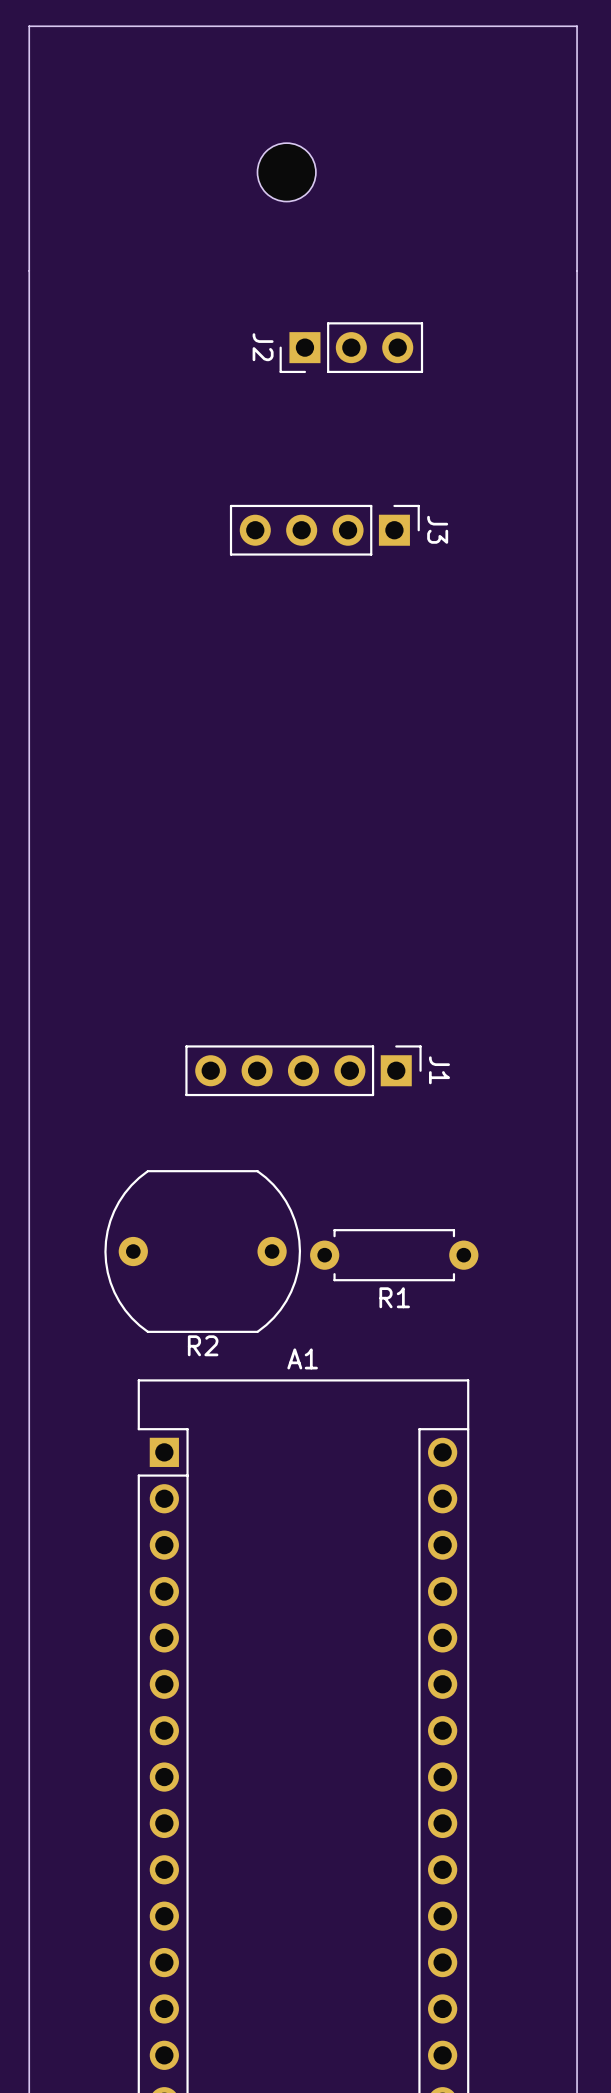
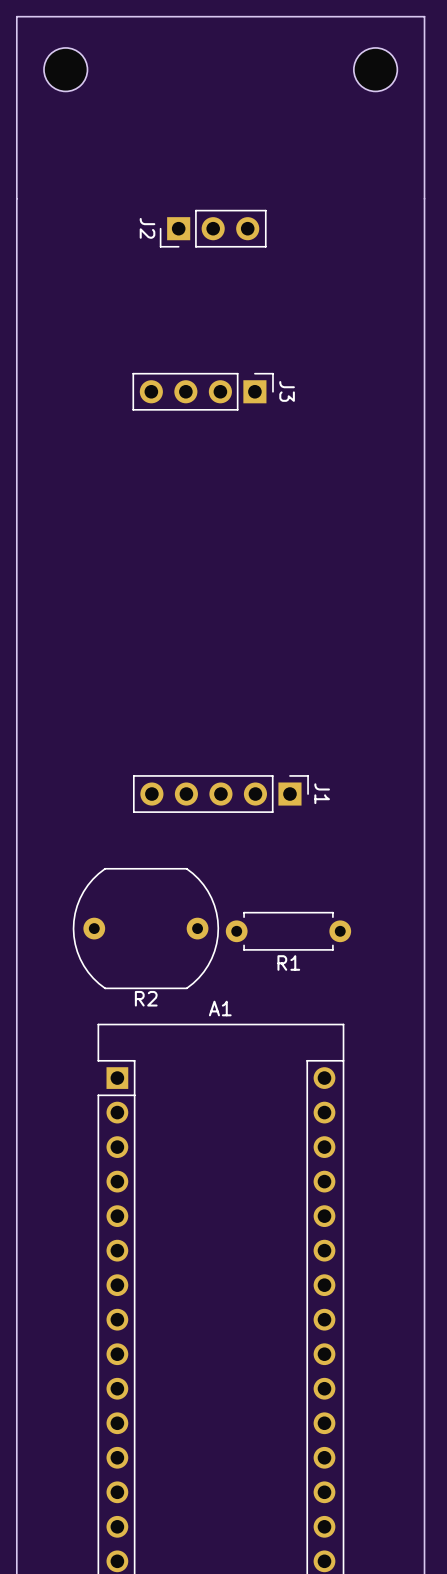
part: none -> (65, 69)
part: none -> (375, 69)
part: (286, 172) -> none
J2 position: (351, 347) -> (213, 228)
J3 position: (324, 530) -> (203, 391)

